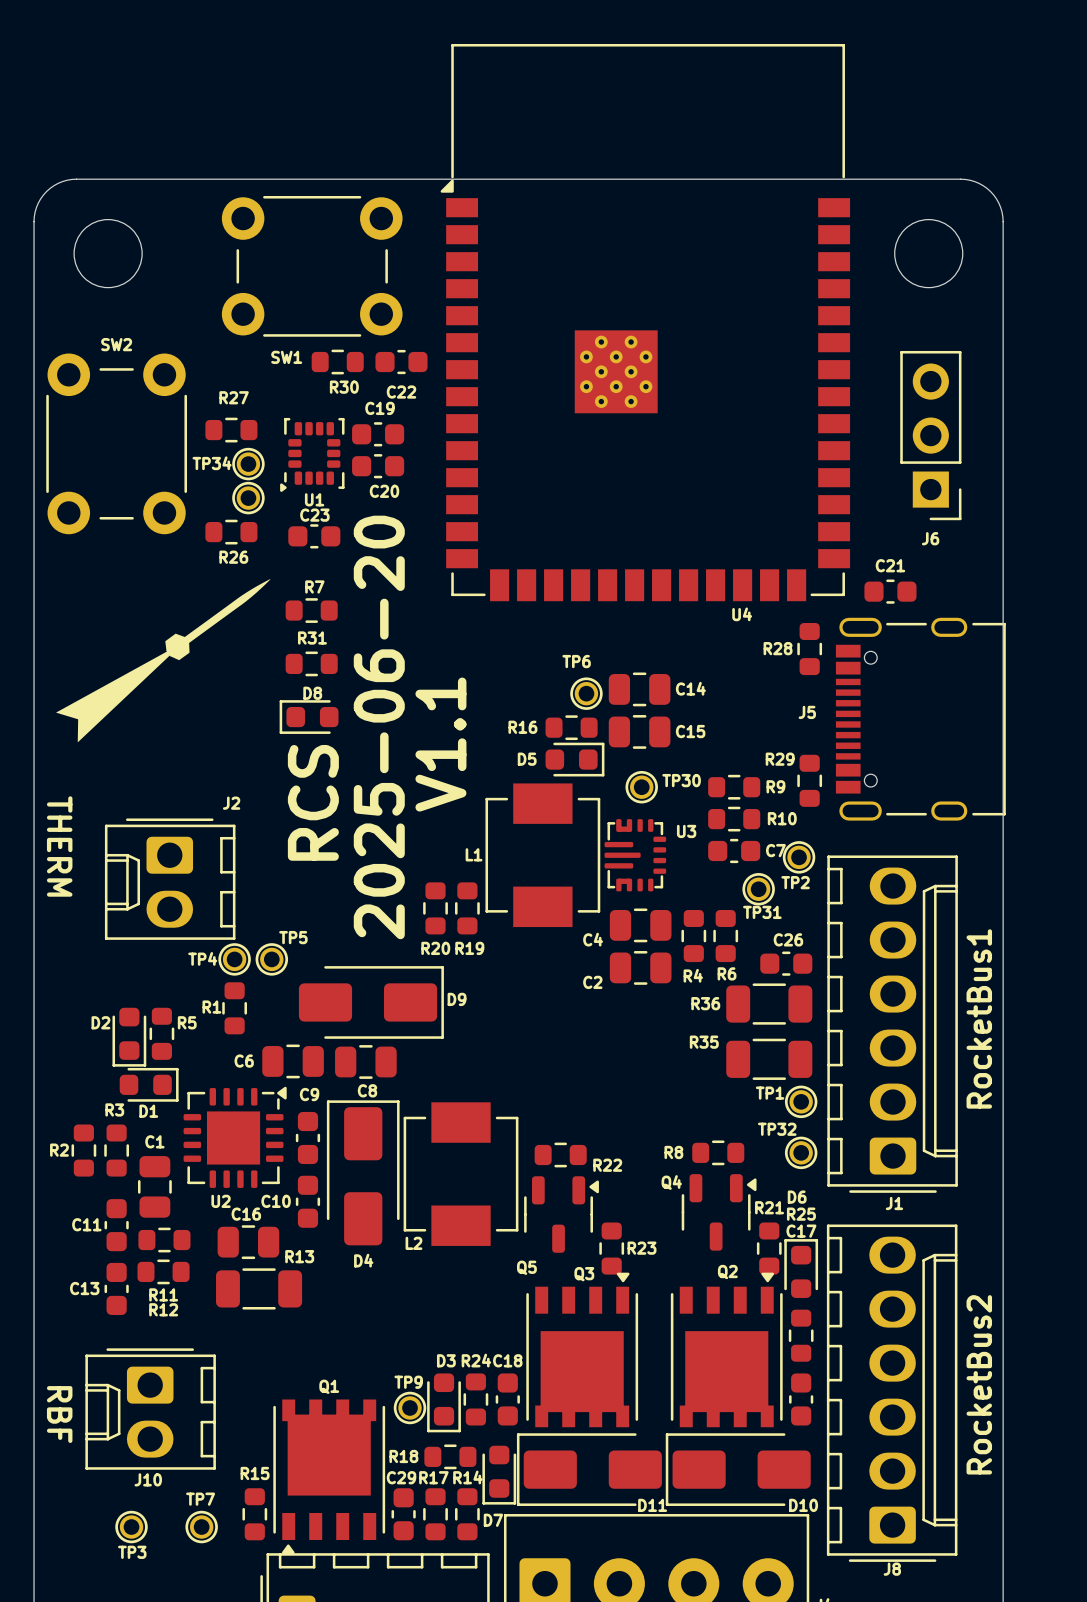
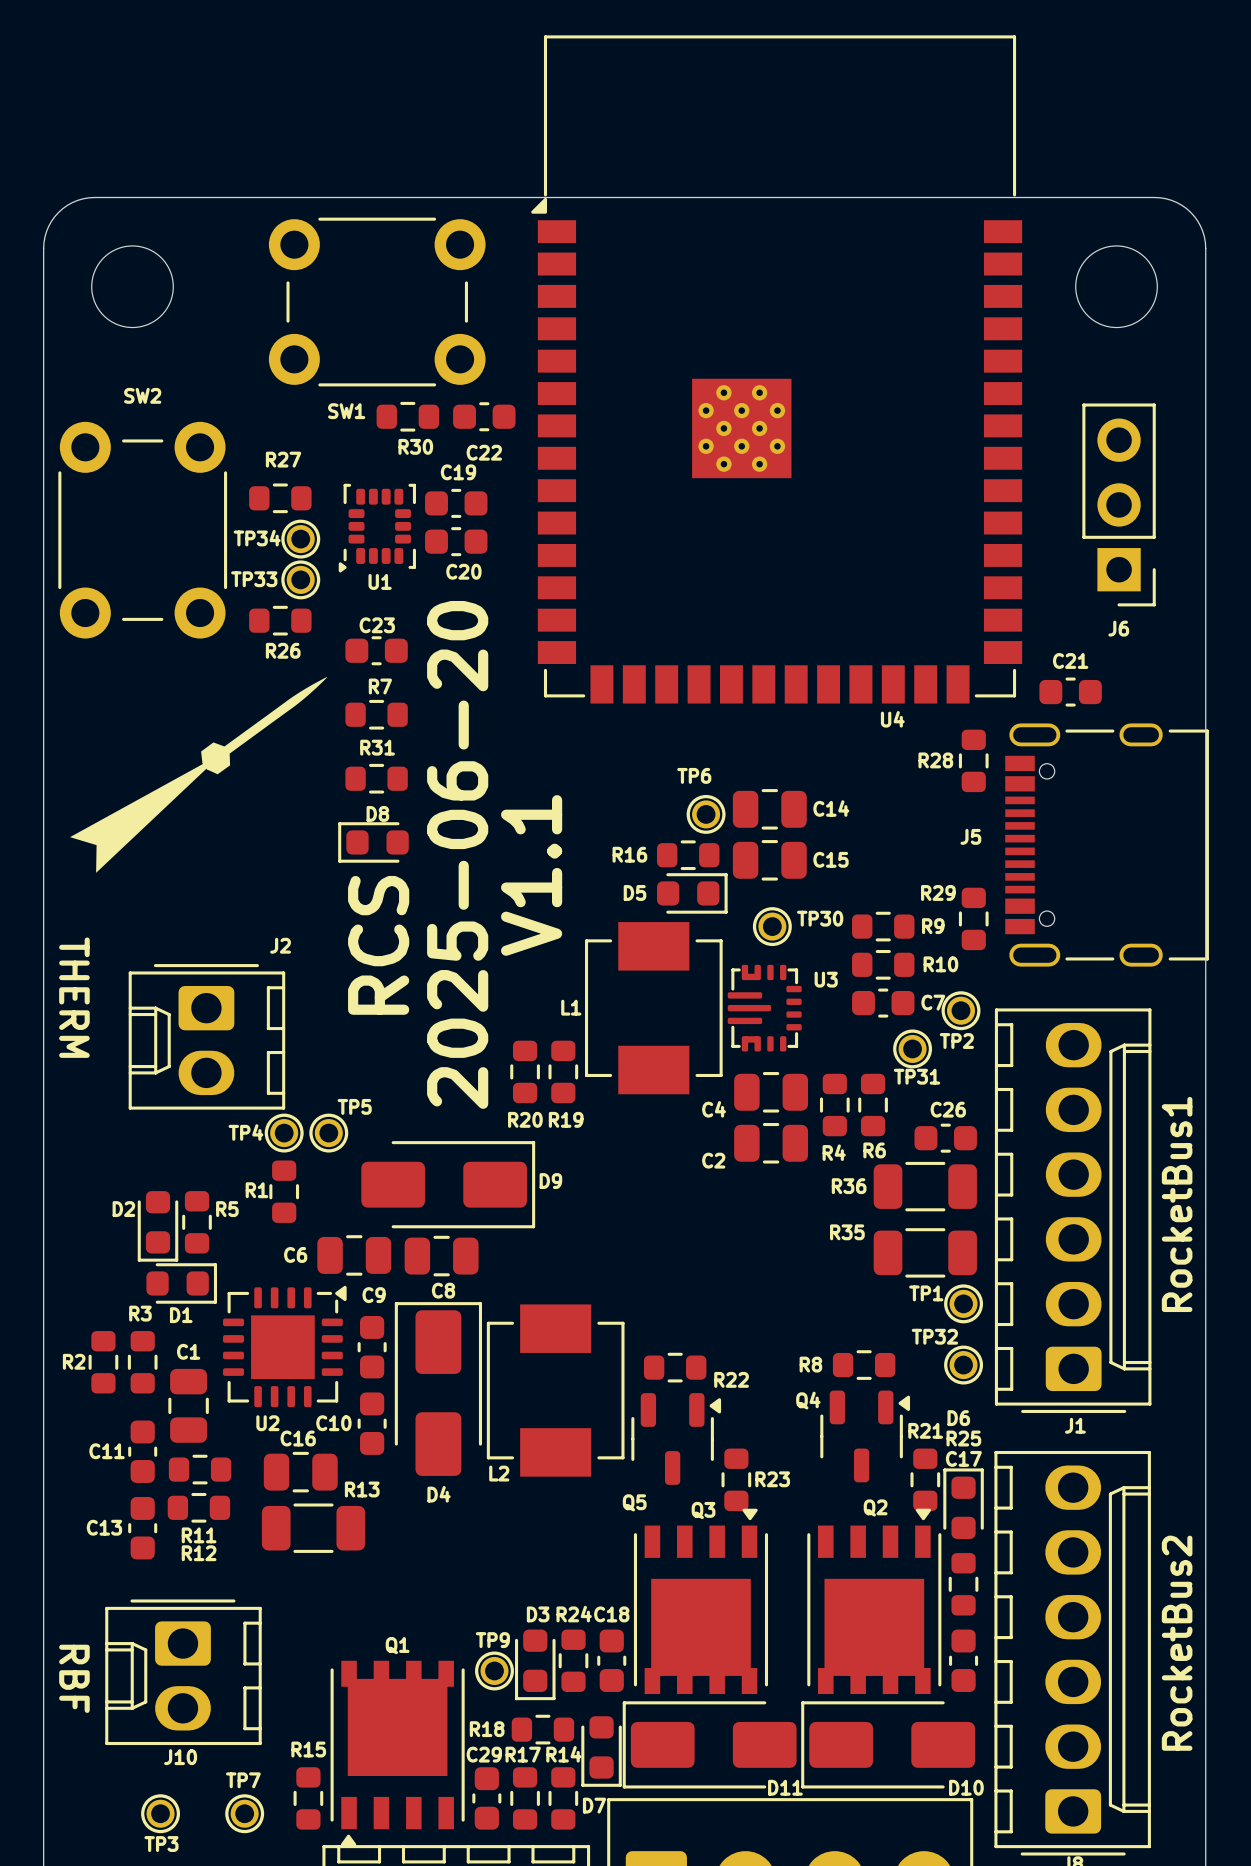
SW2 position: (116, 443) -> (142, 530)
TP33 name: none -> TP33 (254, 579)
C23 position: (314, 536) -> (376, 650)

